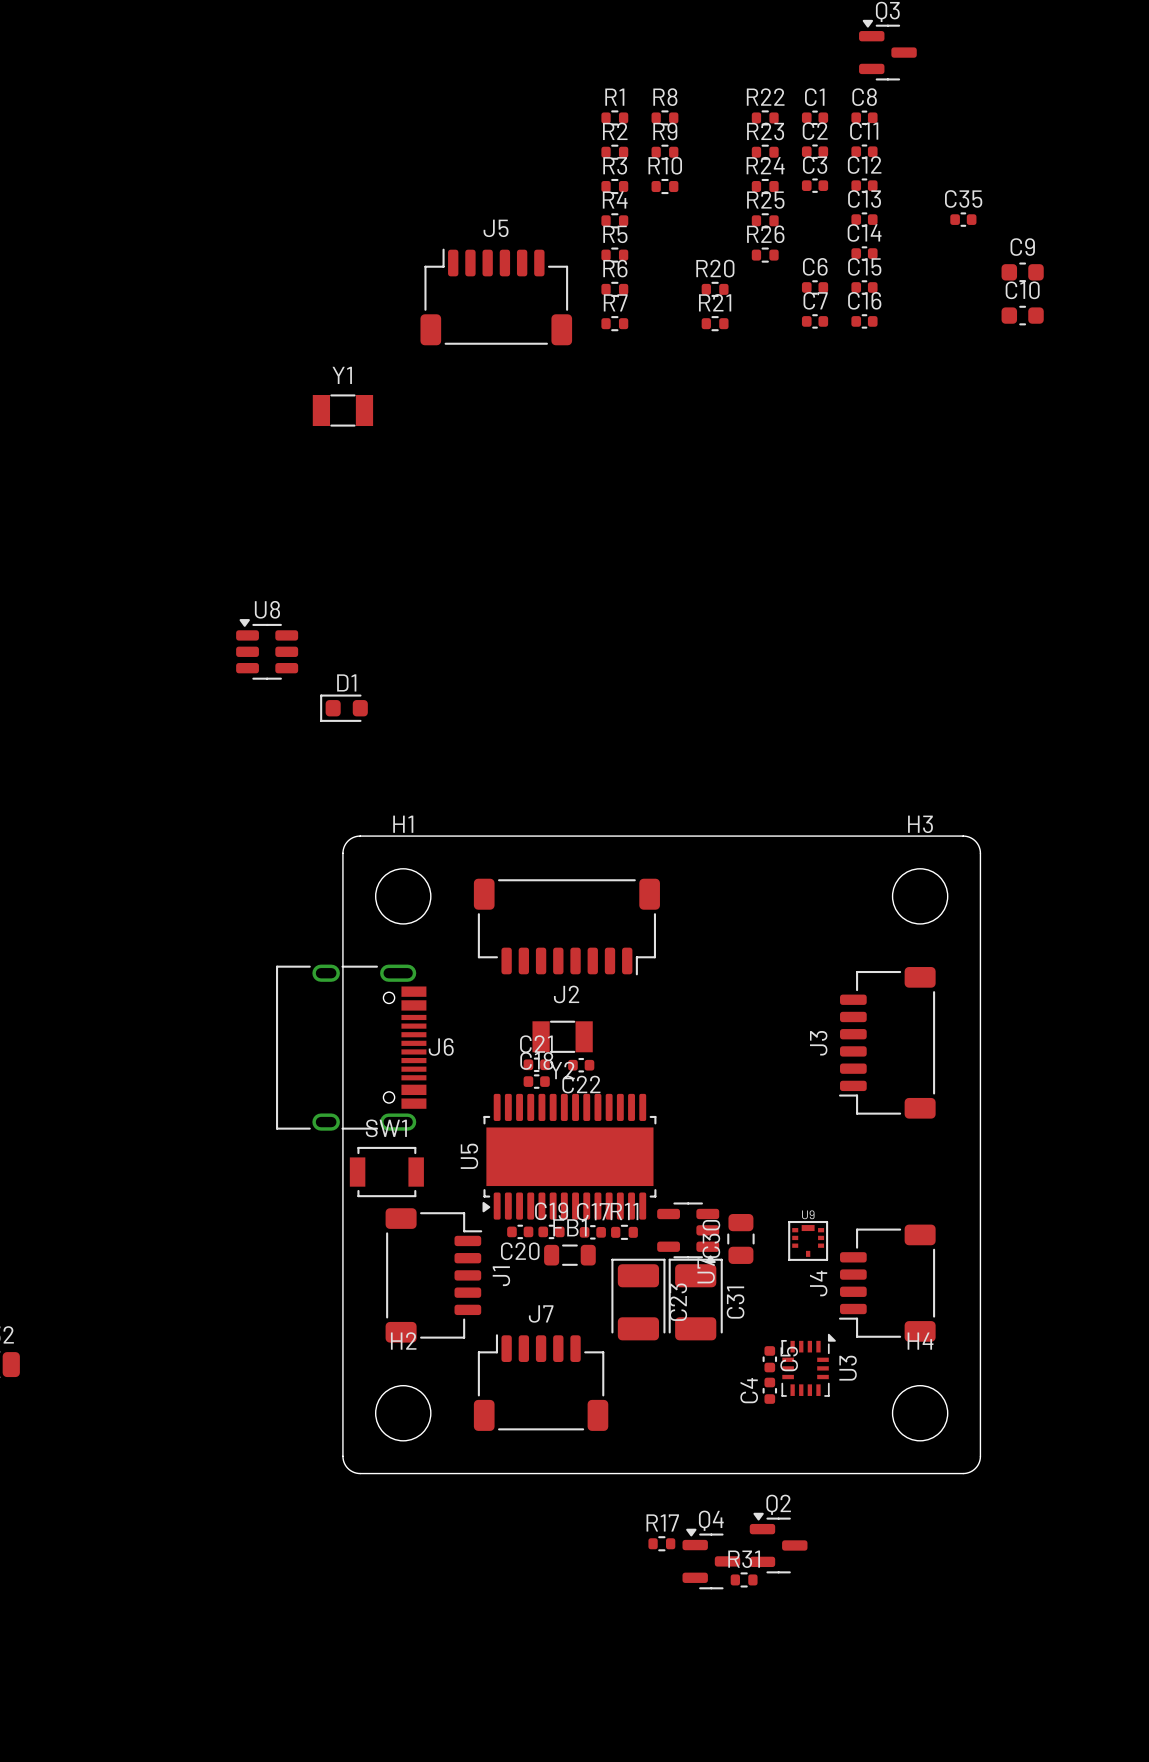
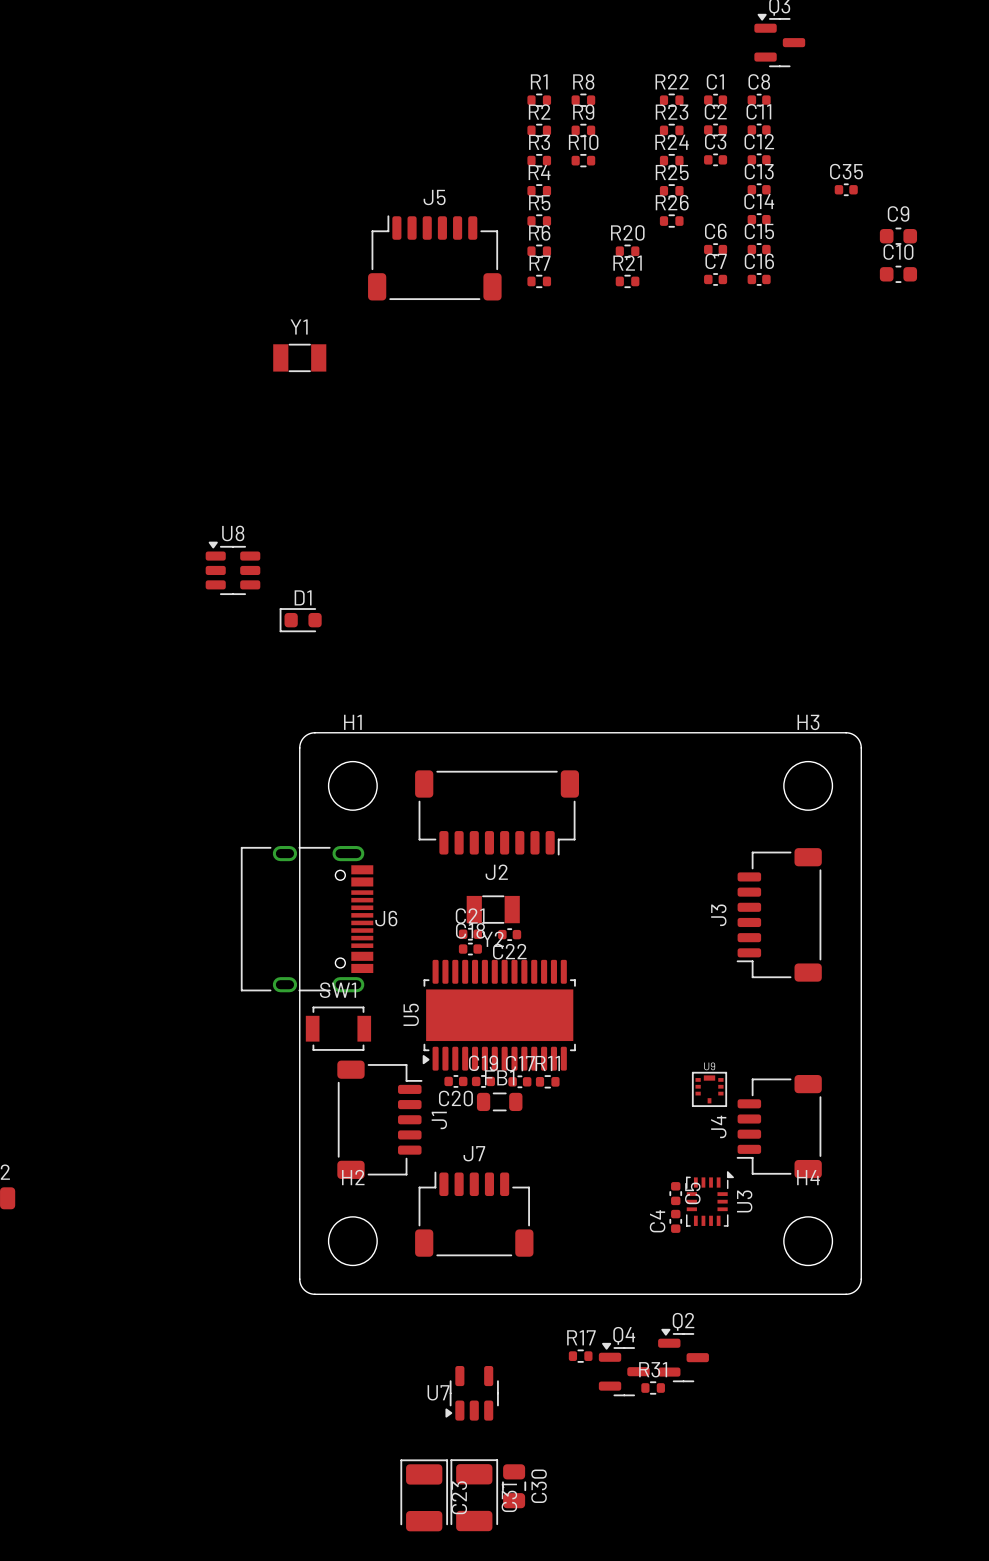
U7 rotation: 0° (688, 1232) -> 90° clockwise (472, 1393)
U7 position: (688, 1232) -> (472, 1393)
C30 name position: C30 (711, 1238) -> C30 (539, 1486)
C30 position: (740, 1238) -> (514, 1486)
C23 position: (638, 1299) -> (424, 1495)
C31 position: (695, 1299) -> (474, 1495)

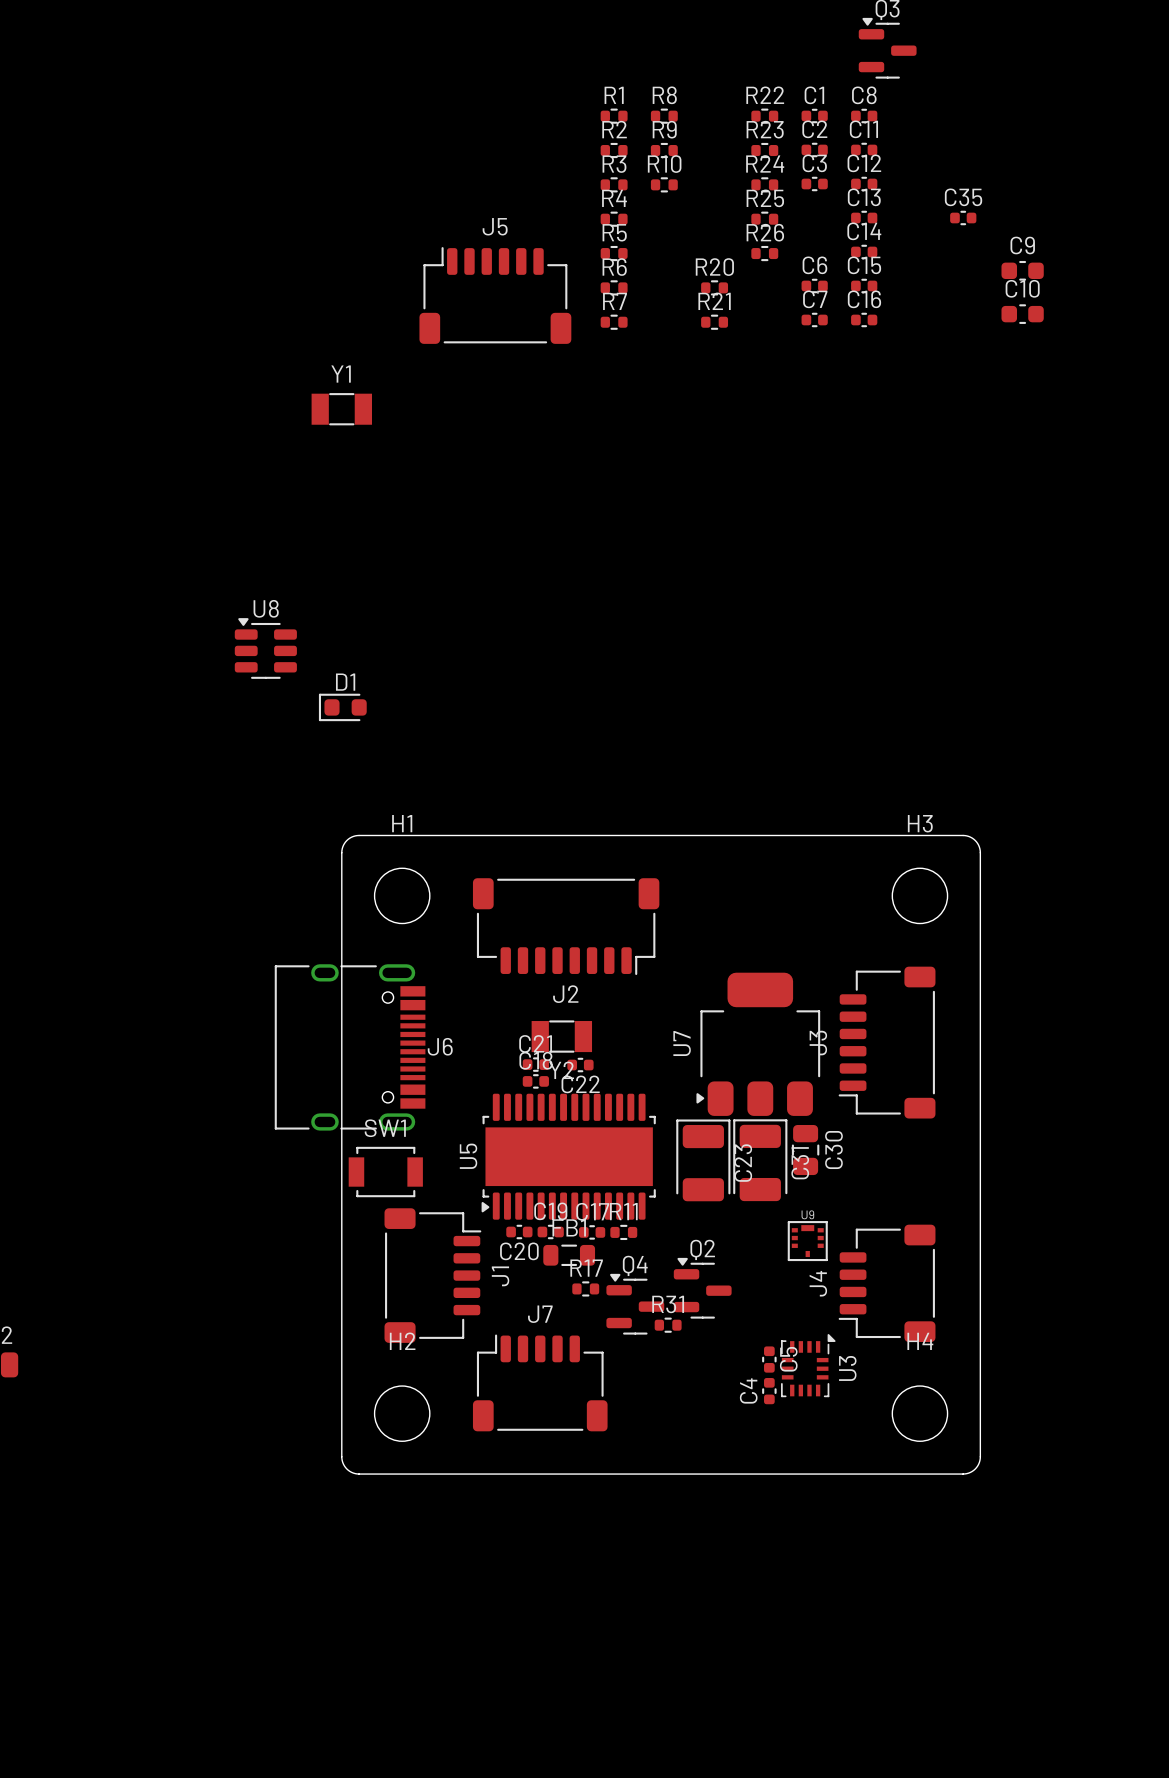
Q2 position: (683, 1355) -> (702, 1288)
R17 position: (580, 1356) -> (585, 1288)
U7 footprint: [445, 1365, 499, 1421] -> [696, 972, 821, 1116]
Q4 position: (624, 1369) -> (635, 1304)
R31 position: (653, 1388) -> (668, 1325)
U7 name position: U7 (438, 1392) -> U7 (682, 1043)
C30 position: (514, 1486) -> (805, 1150)
C23 position: (424, 1495) -> (703, 1160)
C31 position: (474, 1495) -> (760, 1160)

